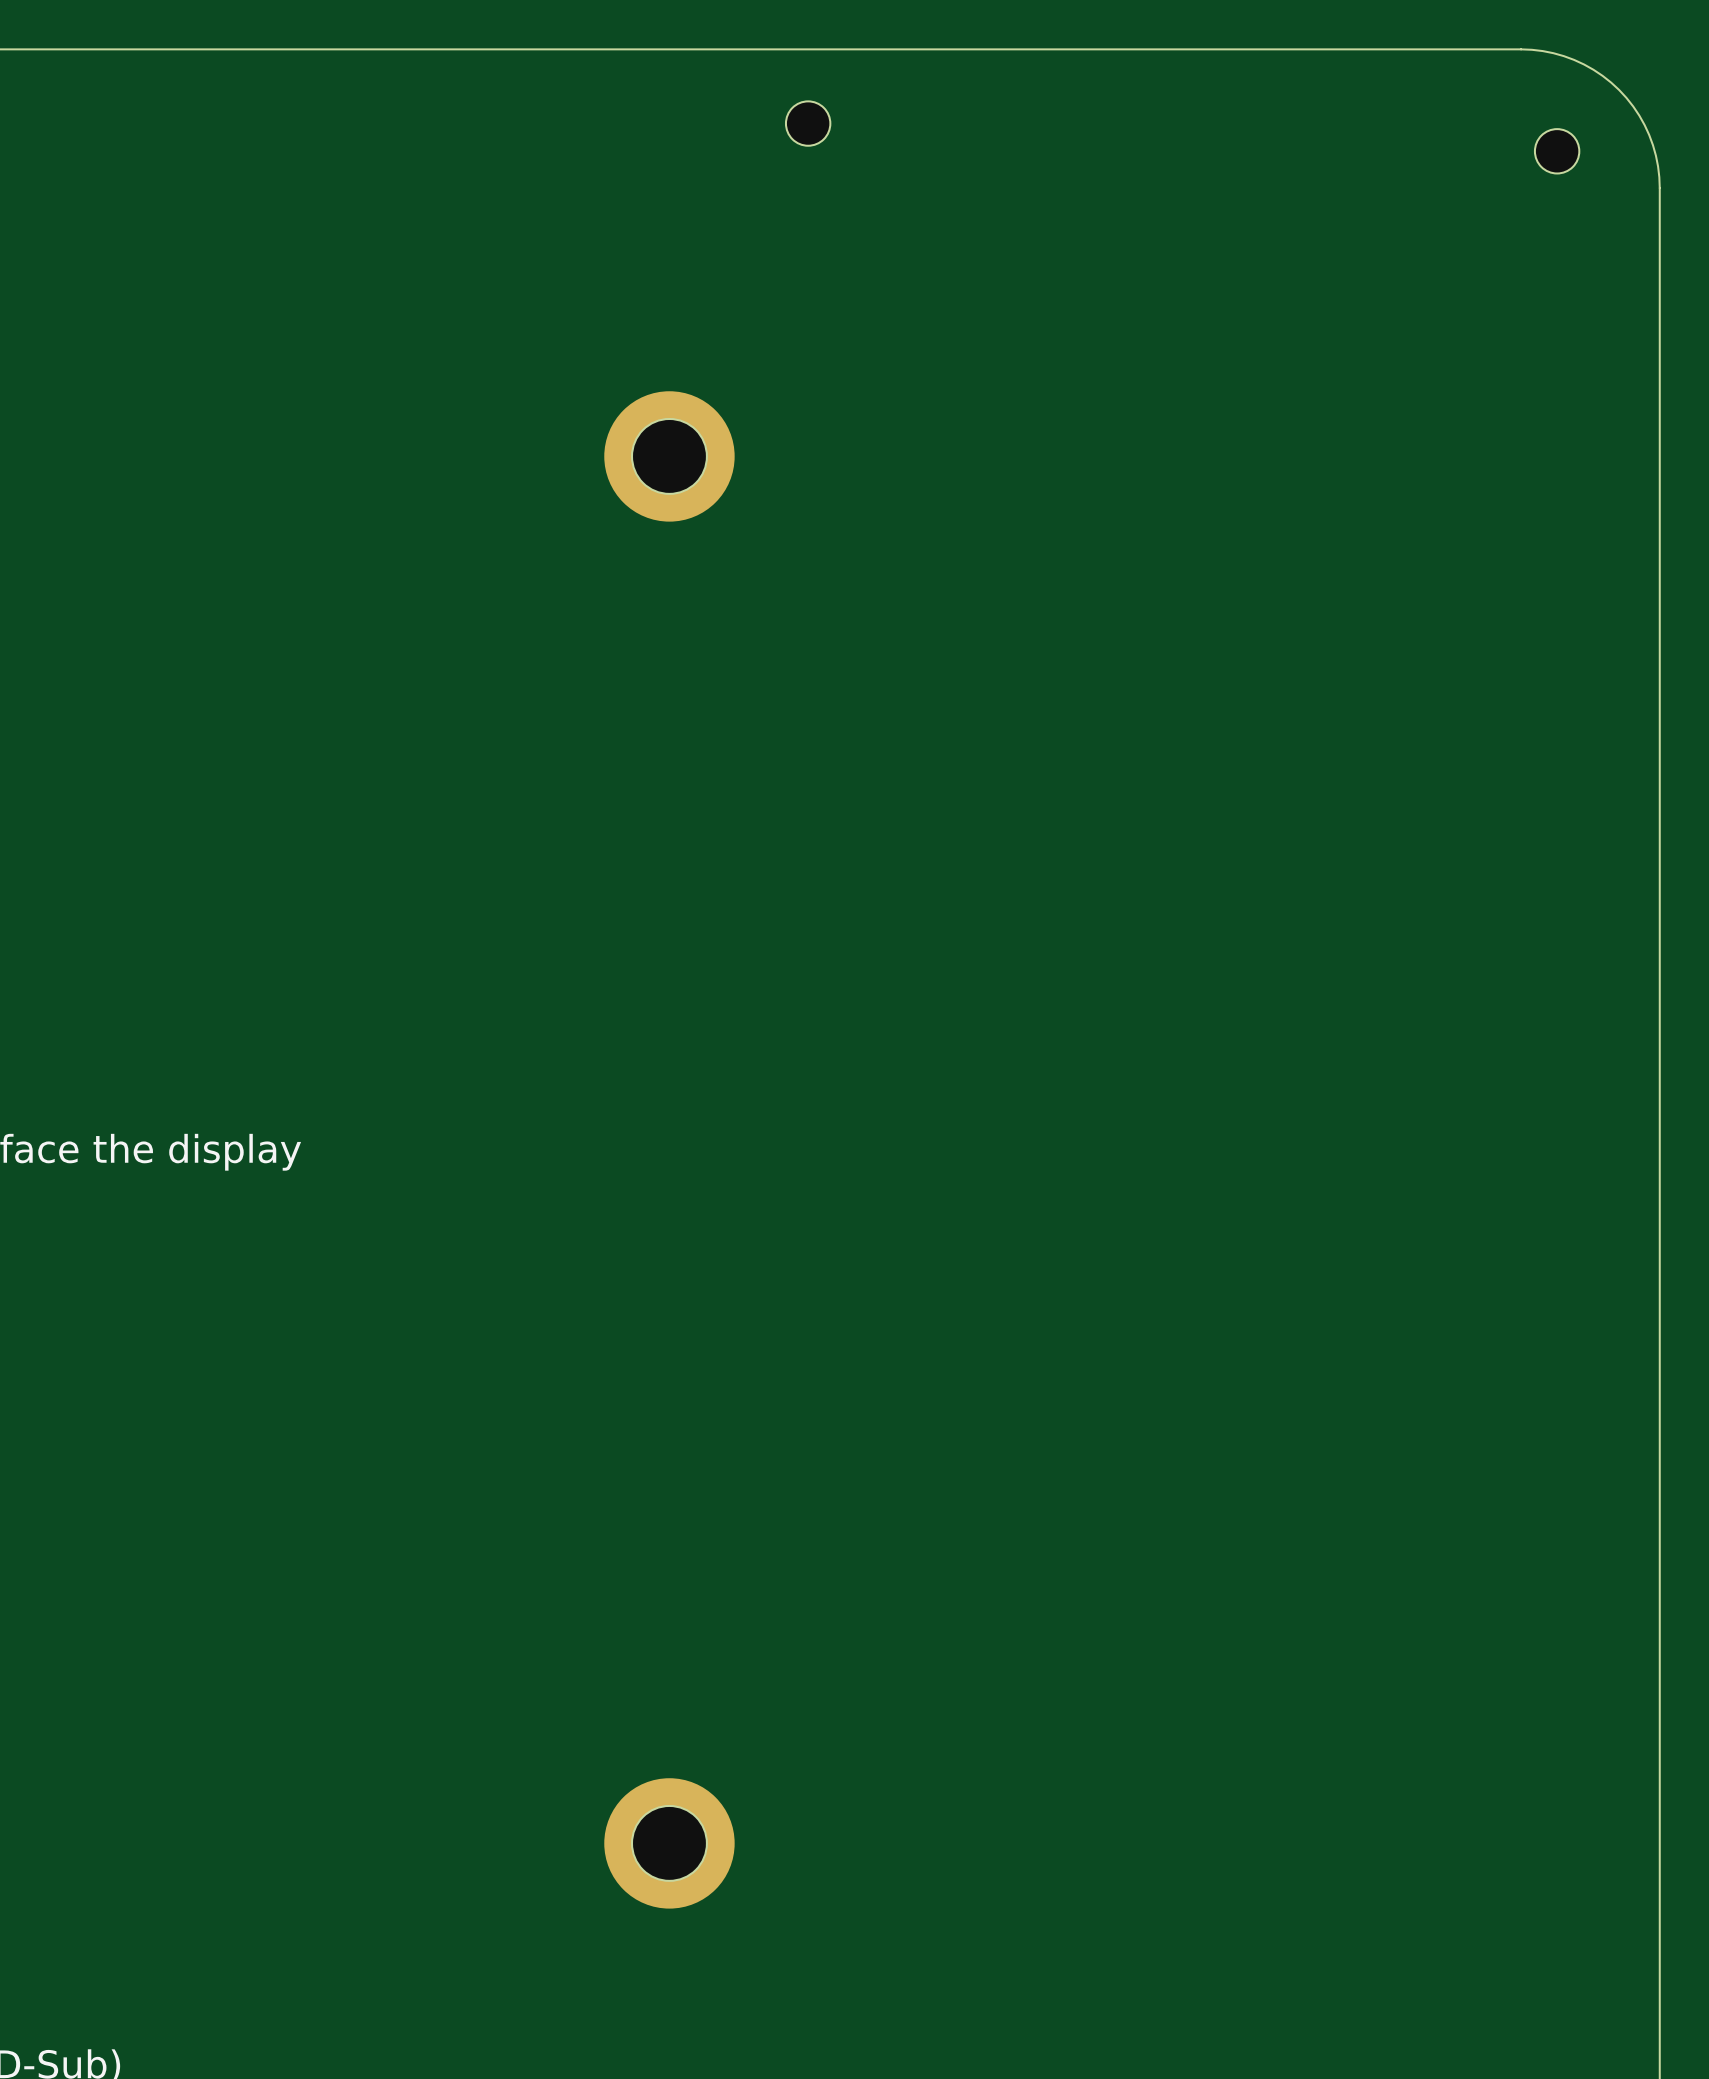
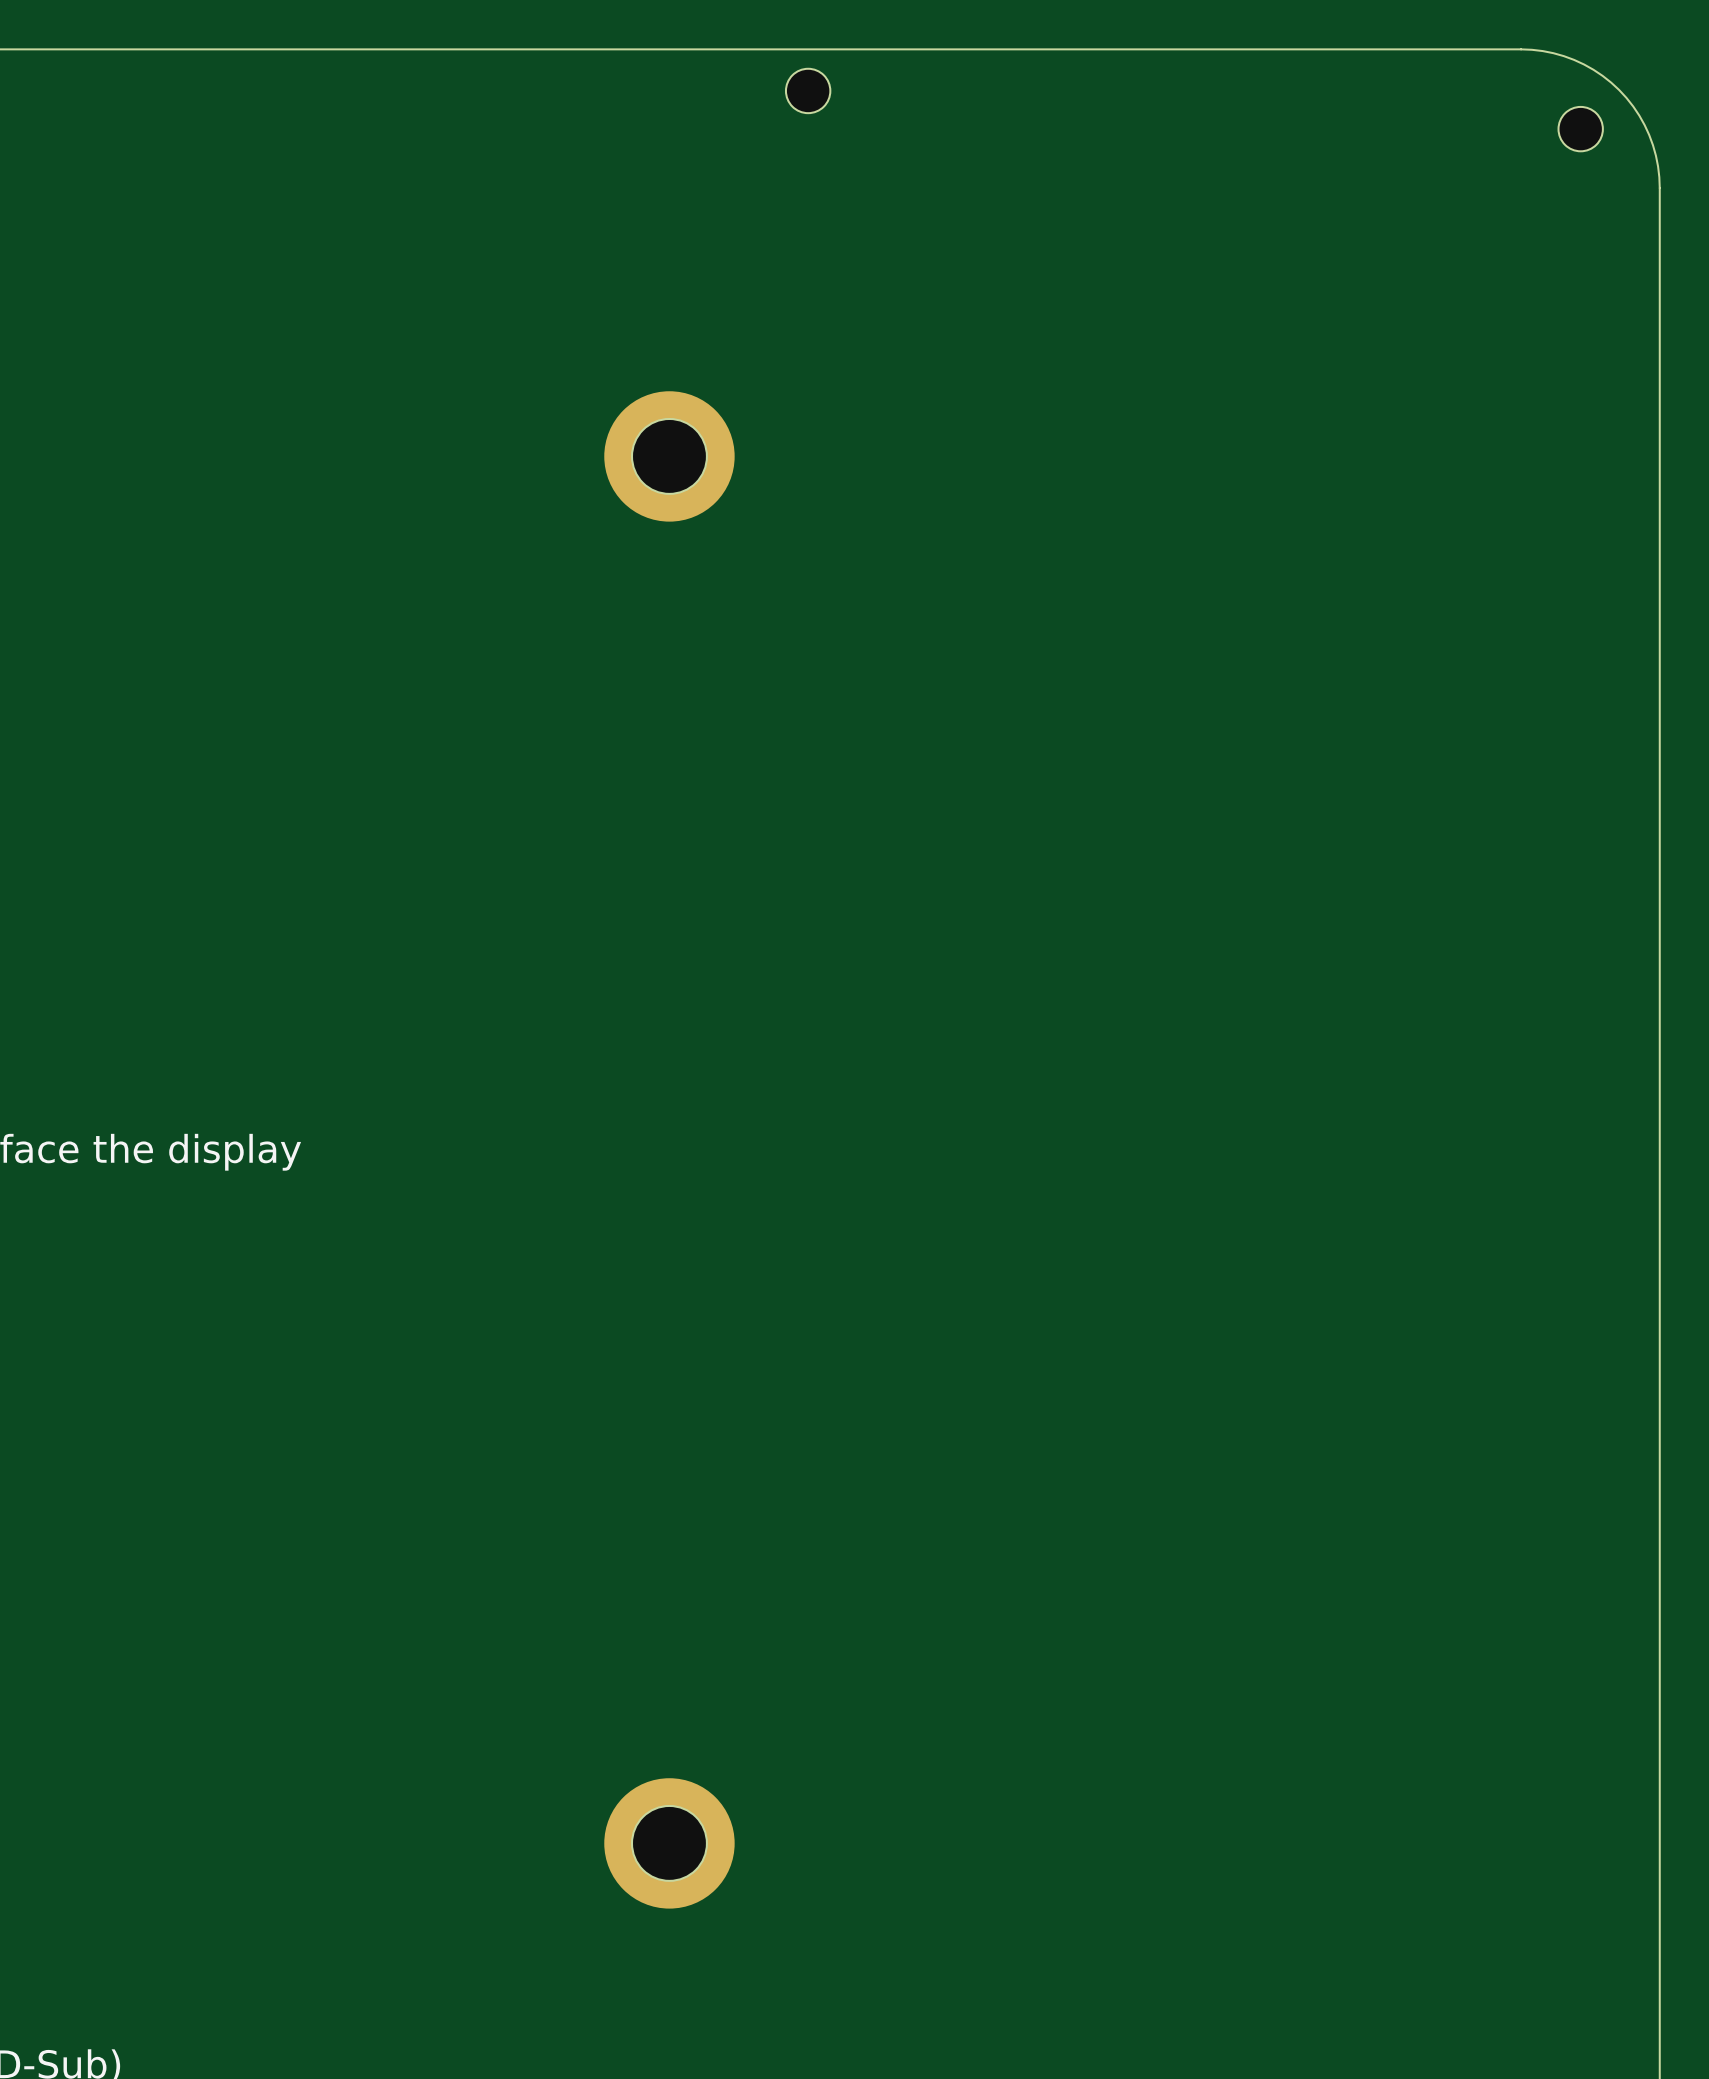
part position: (808, 123) -> (808, 90)
part position: (1557, 151) -> (1580, 129)

